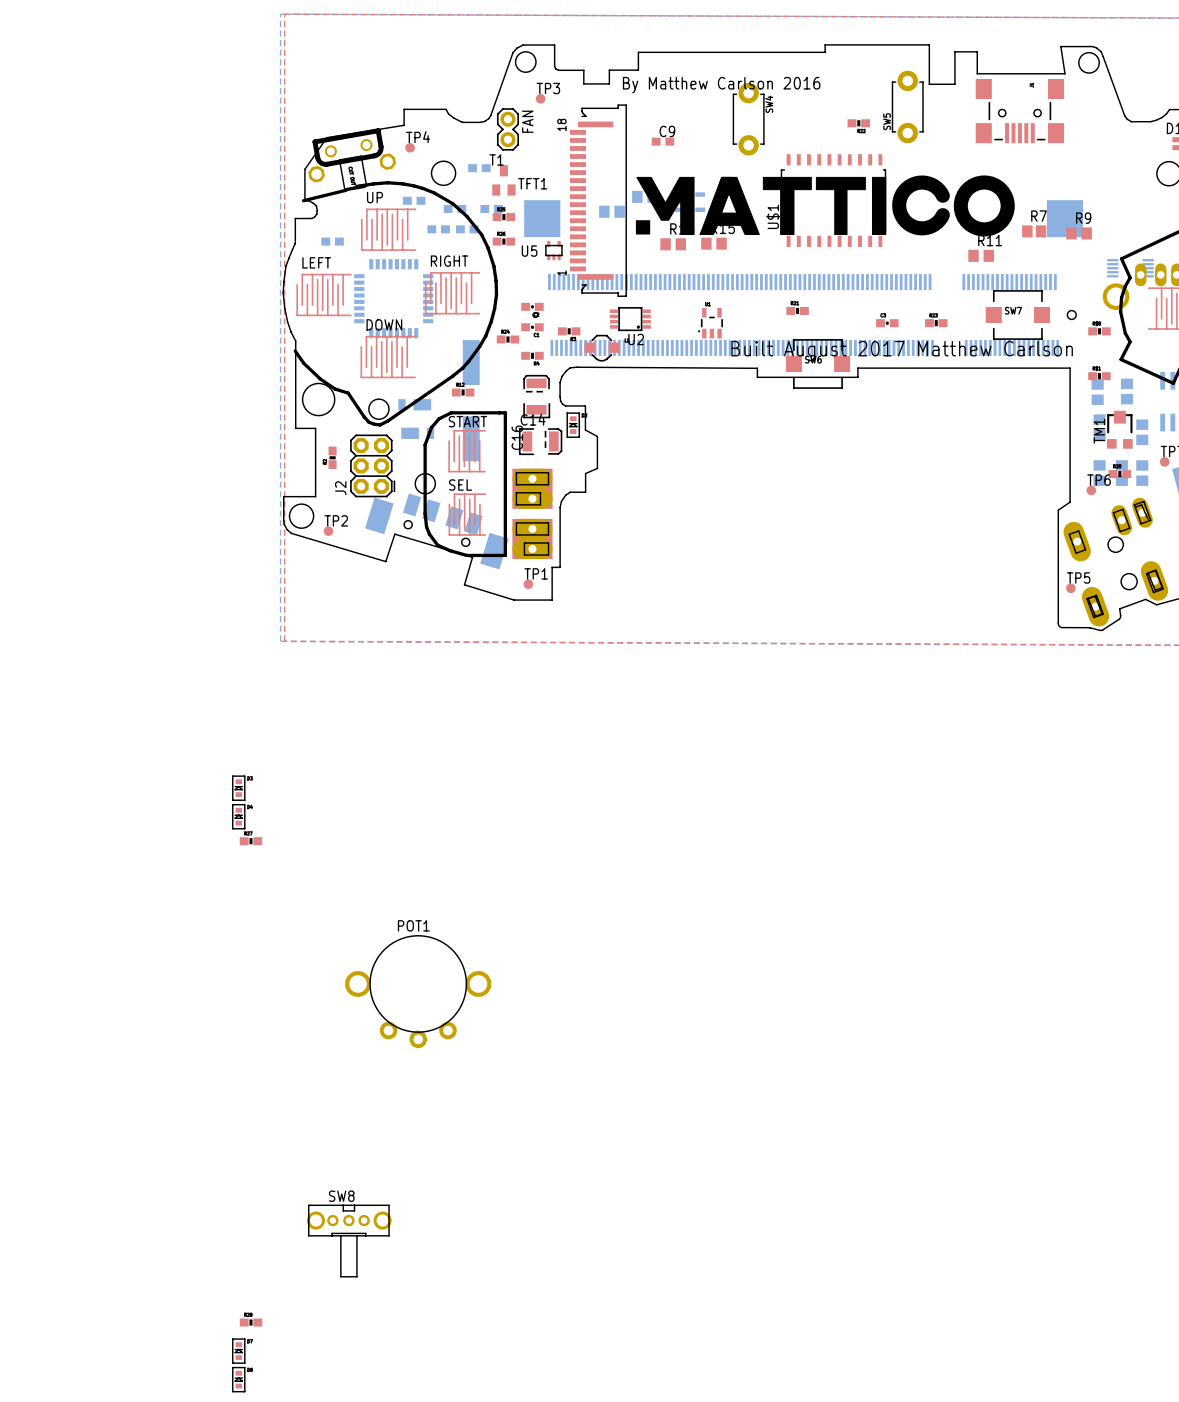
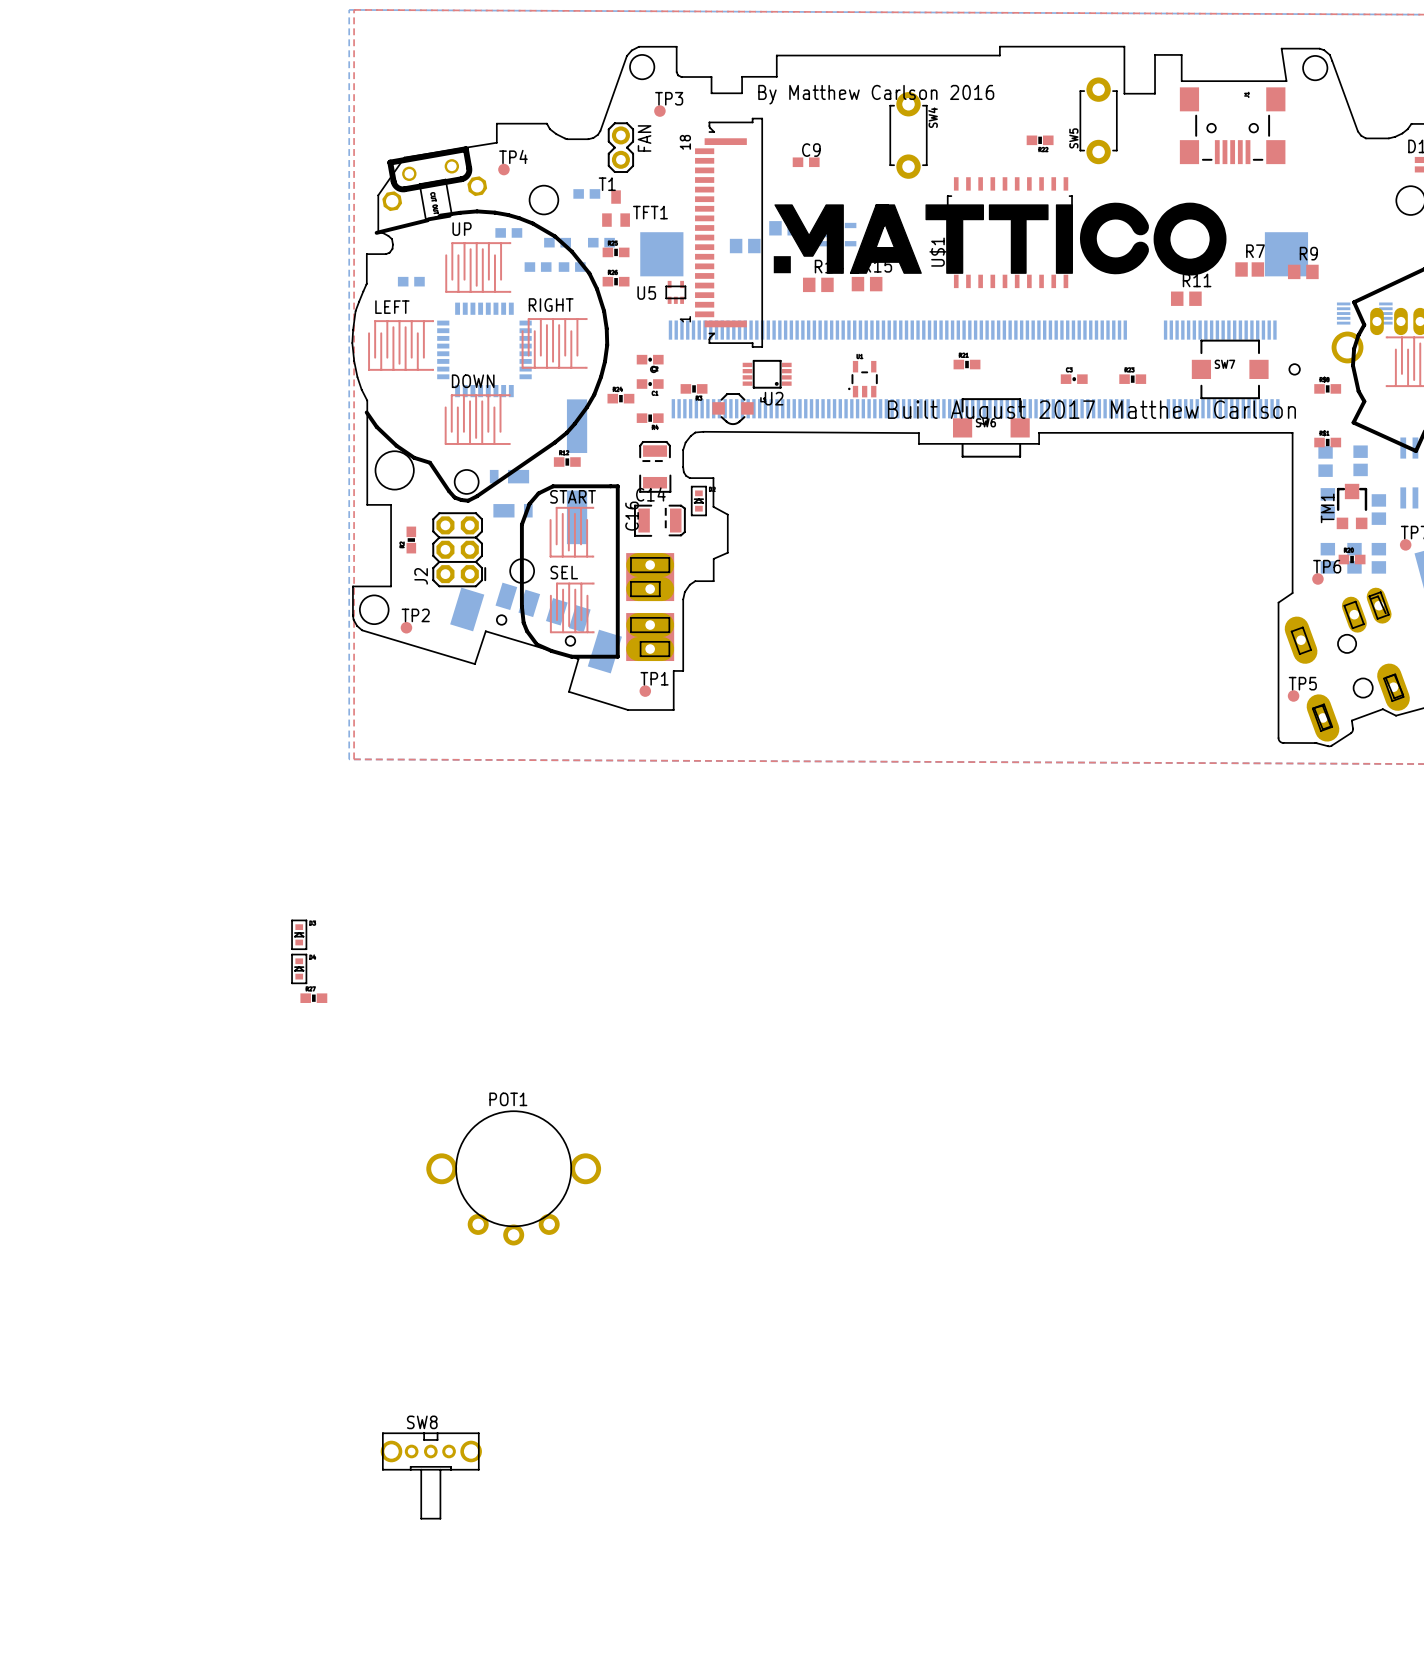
part: (251, 1322) -> none
part: (238, 1351) -> none
part: (238, 1379) -> none

